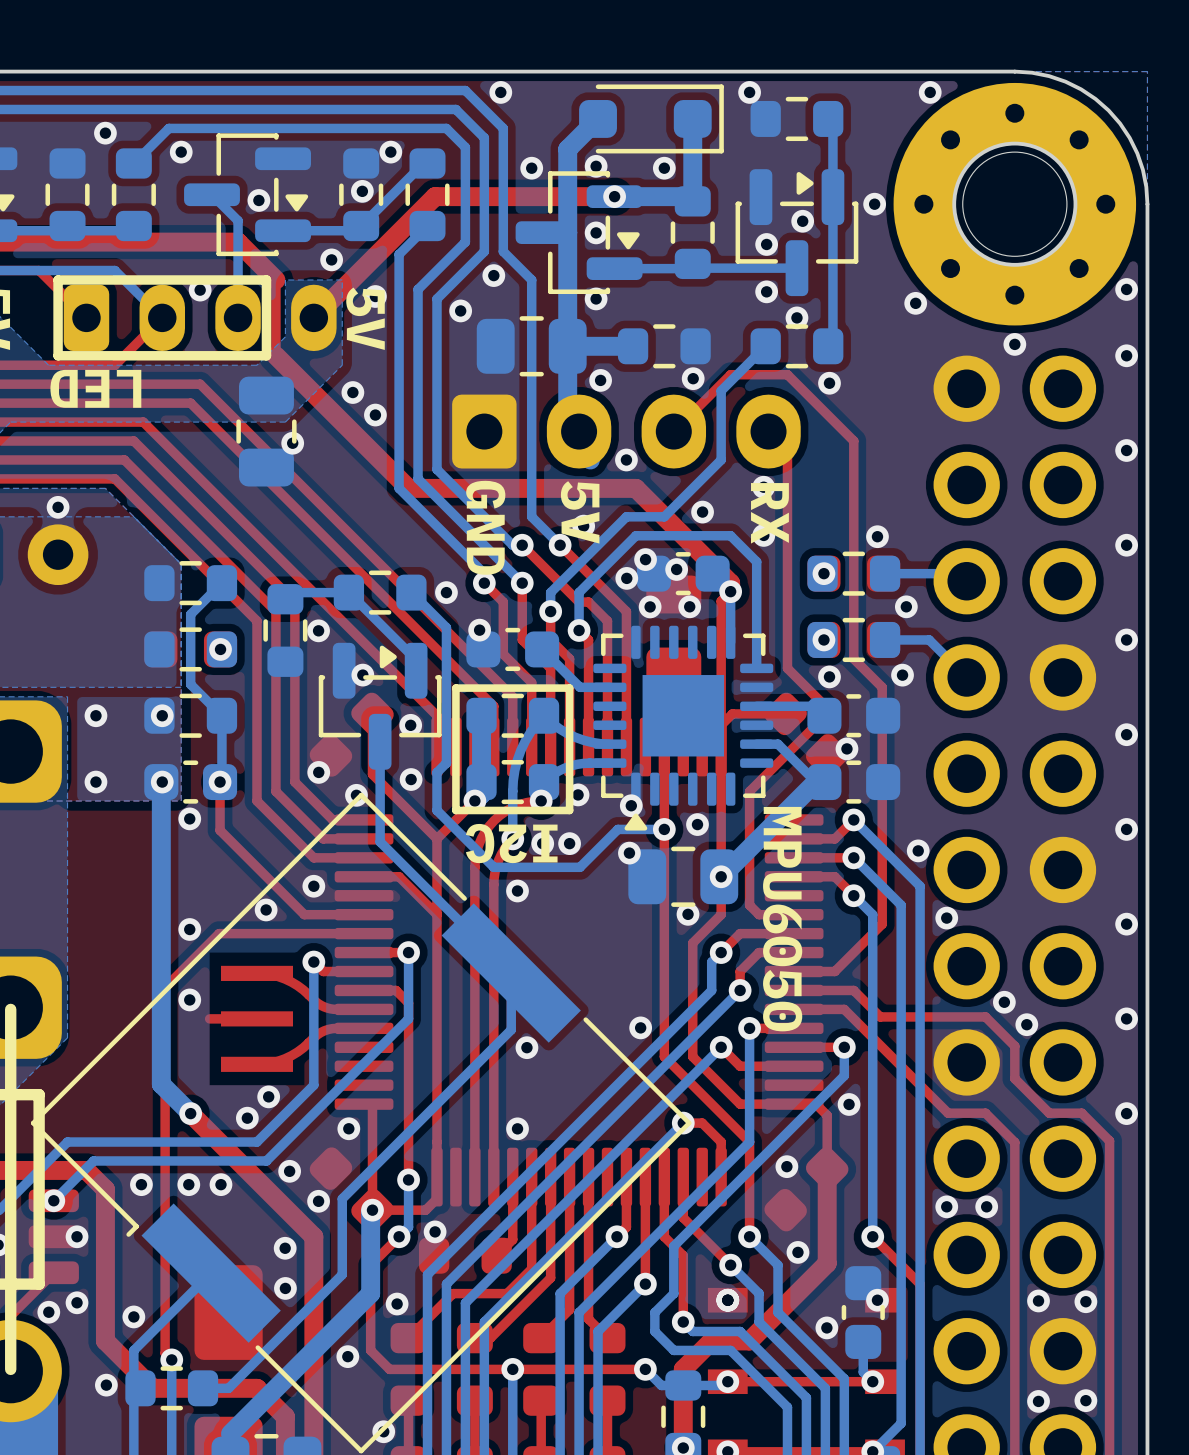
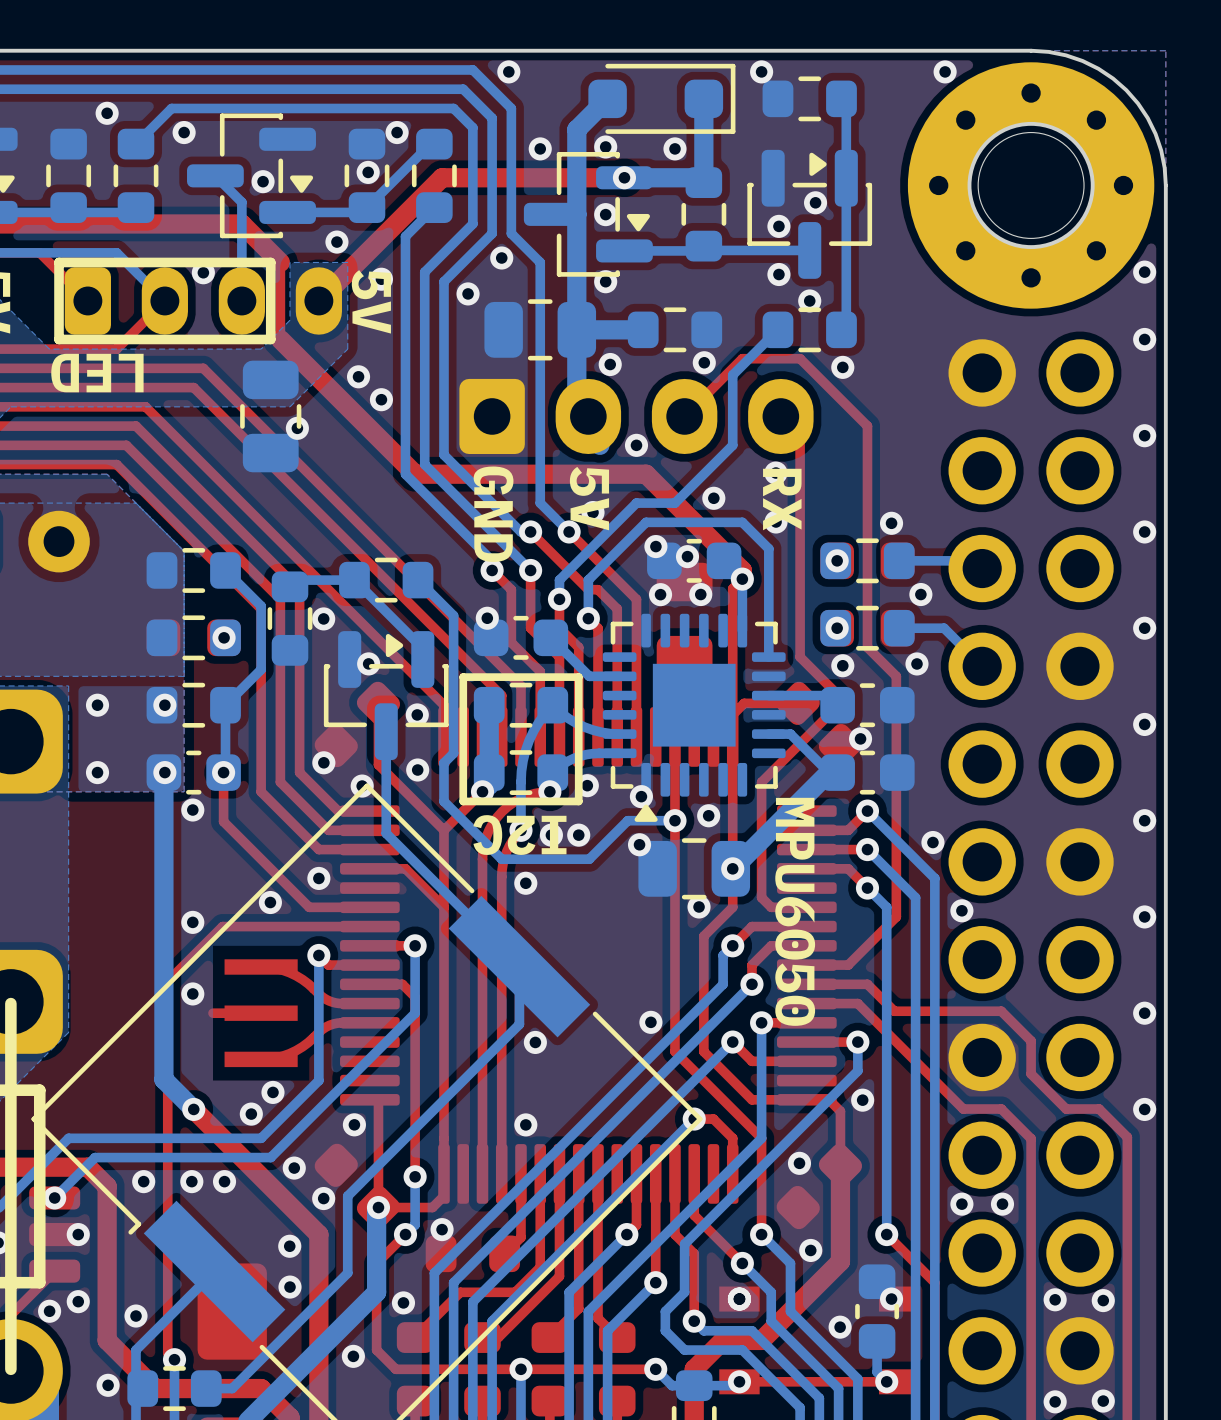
via: (874, 204) -> none
via: (915, 303) -> none
via: (1014, 344) -> none
via: (58, 507) -> none
via: (626, 578) -> none
bottom track: (221, 583) (190, 614) (190, 684) (221, 715) -> (225, 570) (261, 606) (261, 669) (225, 705)
via: (446, 592) -> none
via: (1004, 1002) -> none
via: (1026, 1024) -> none

